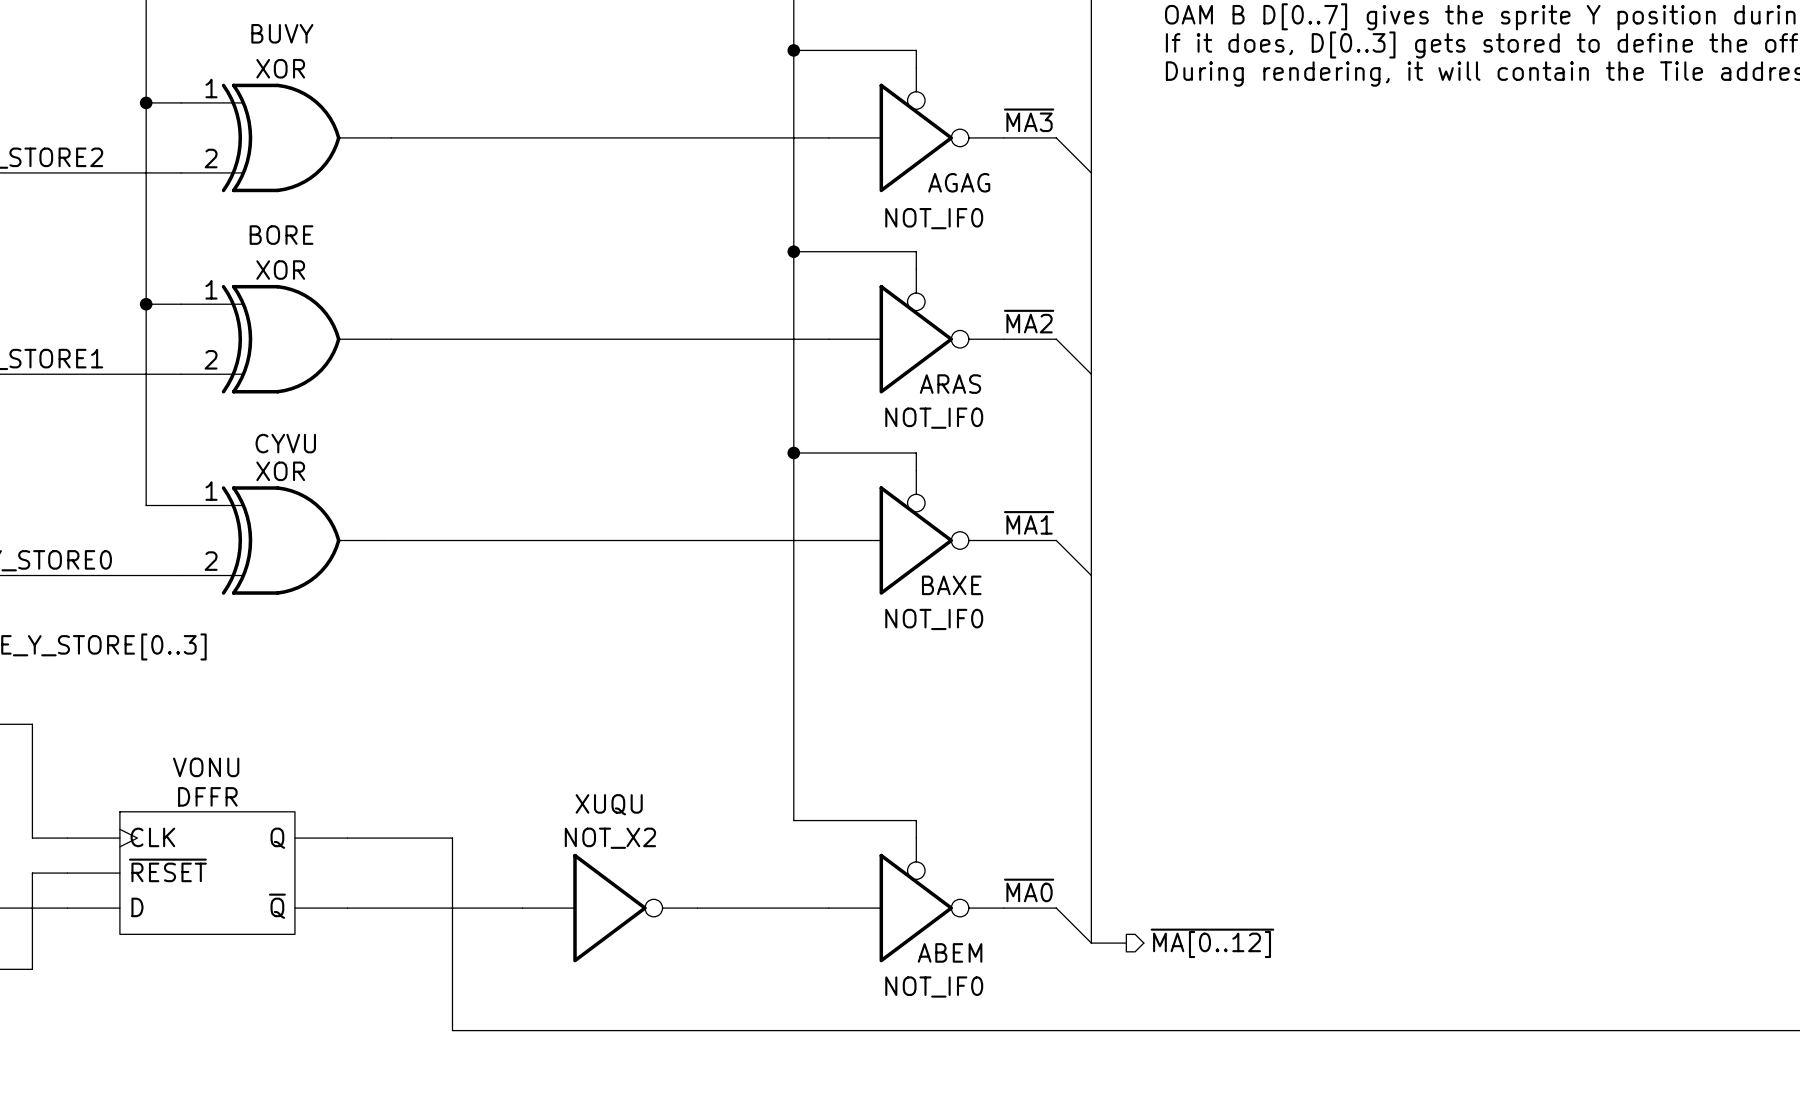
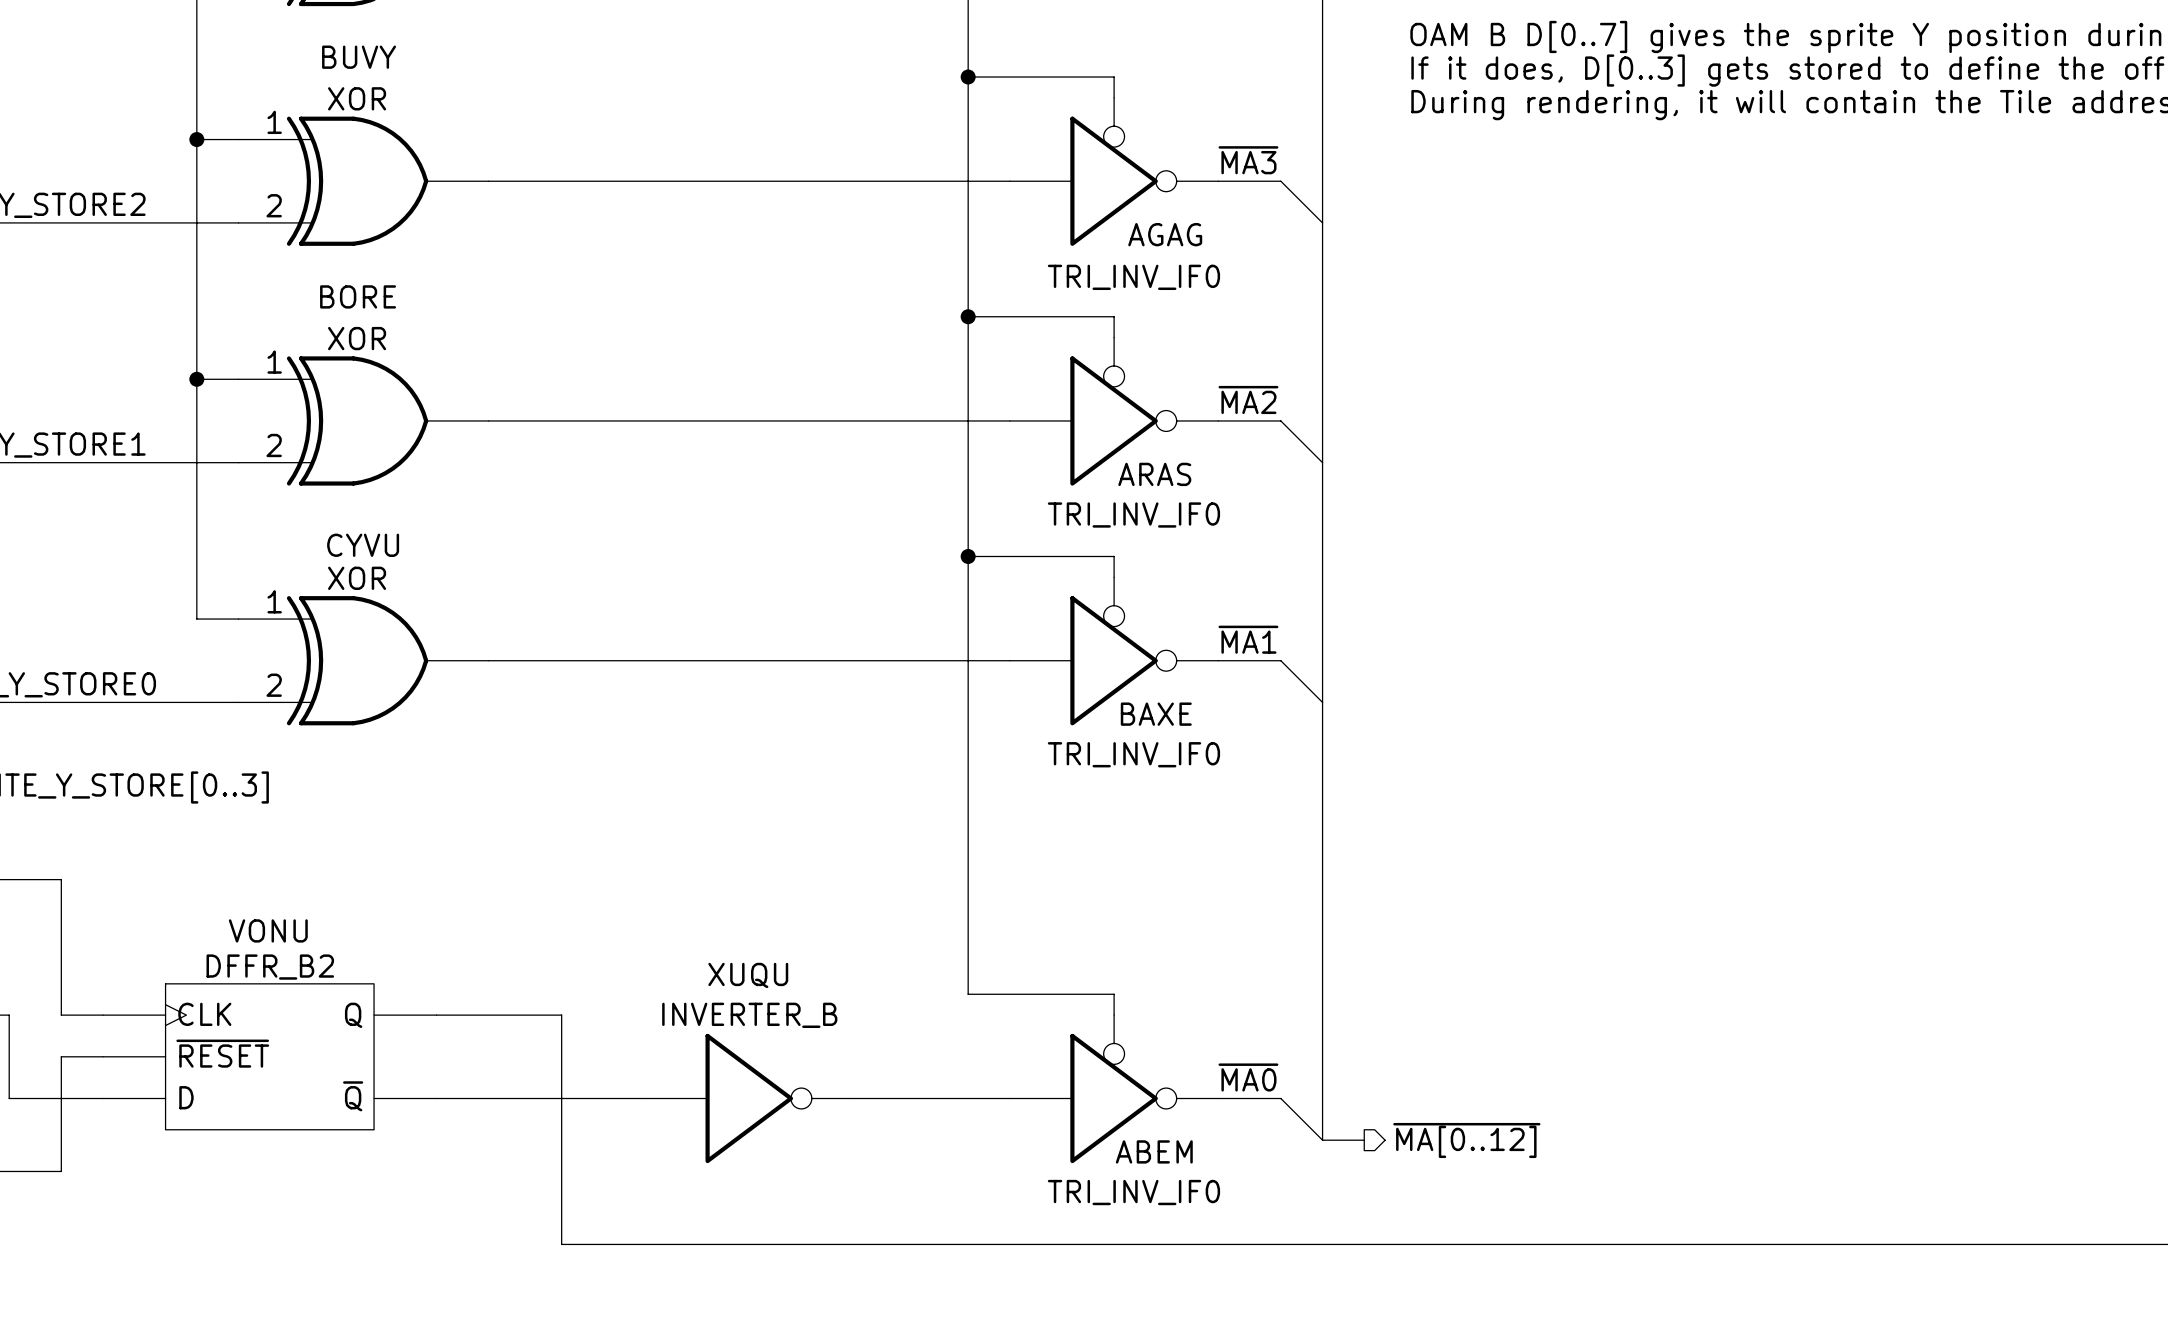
AGAG value: NOT_IF0 (934, 218) -> TRI_INV_IF0 (1133, 277)
ARAS value: NOT_IF0 (934, 418) -> TRI_INV_IF0 (1133, 515)
BAXE value: NOT_IF0 (934, 619) -> TRI_INV_IF0 (1133, 754)
VONU value: DFFR (207, 796) -> DFFR_B2 (270, 967)
XUQU value: NOT_X2 (610, 838) -> INVERTER_B (749, 1015)
ABEM value: NOT_IF0 (934, 987) -> TRI_INV_IF0 (1133, 1192)

